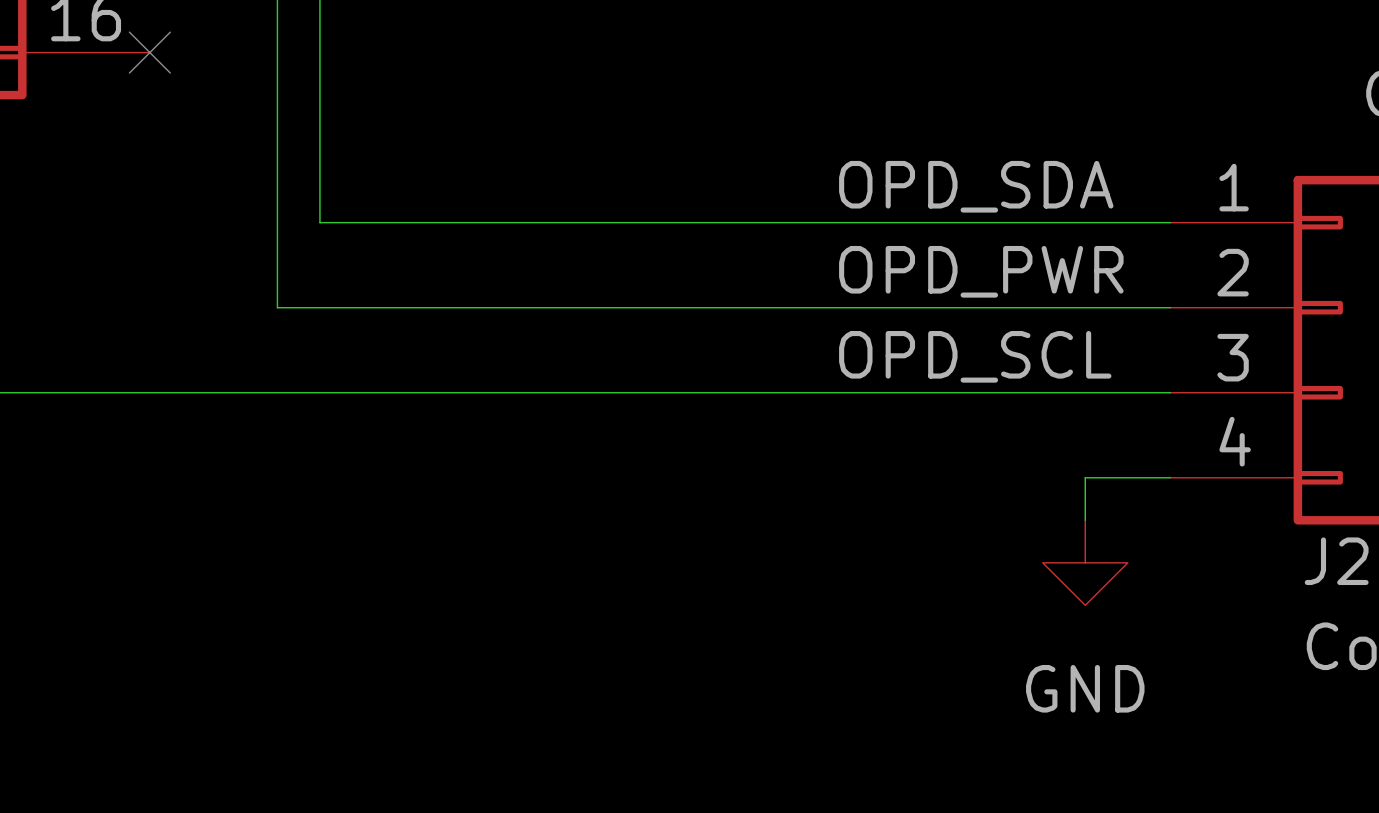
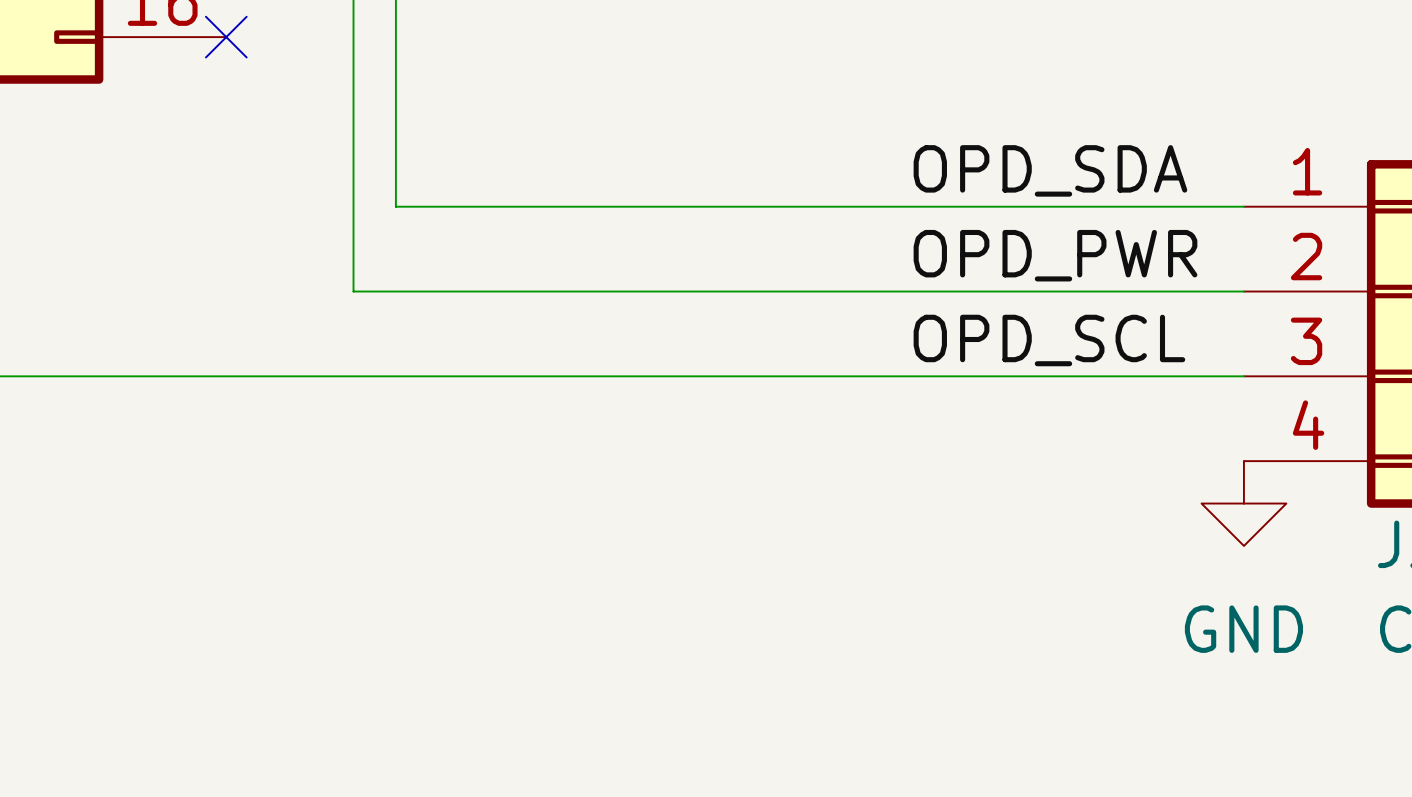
wire: (1170, 477) (1085, 477) (1085, 520) -> none
power symbol position: GND (1085, 562) -> GND (1243, 503)

